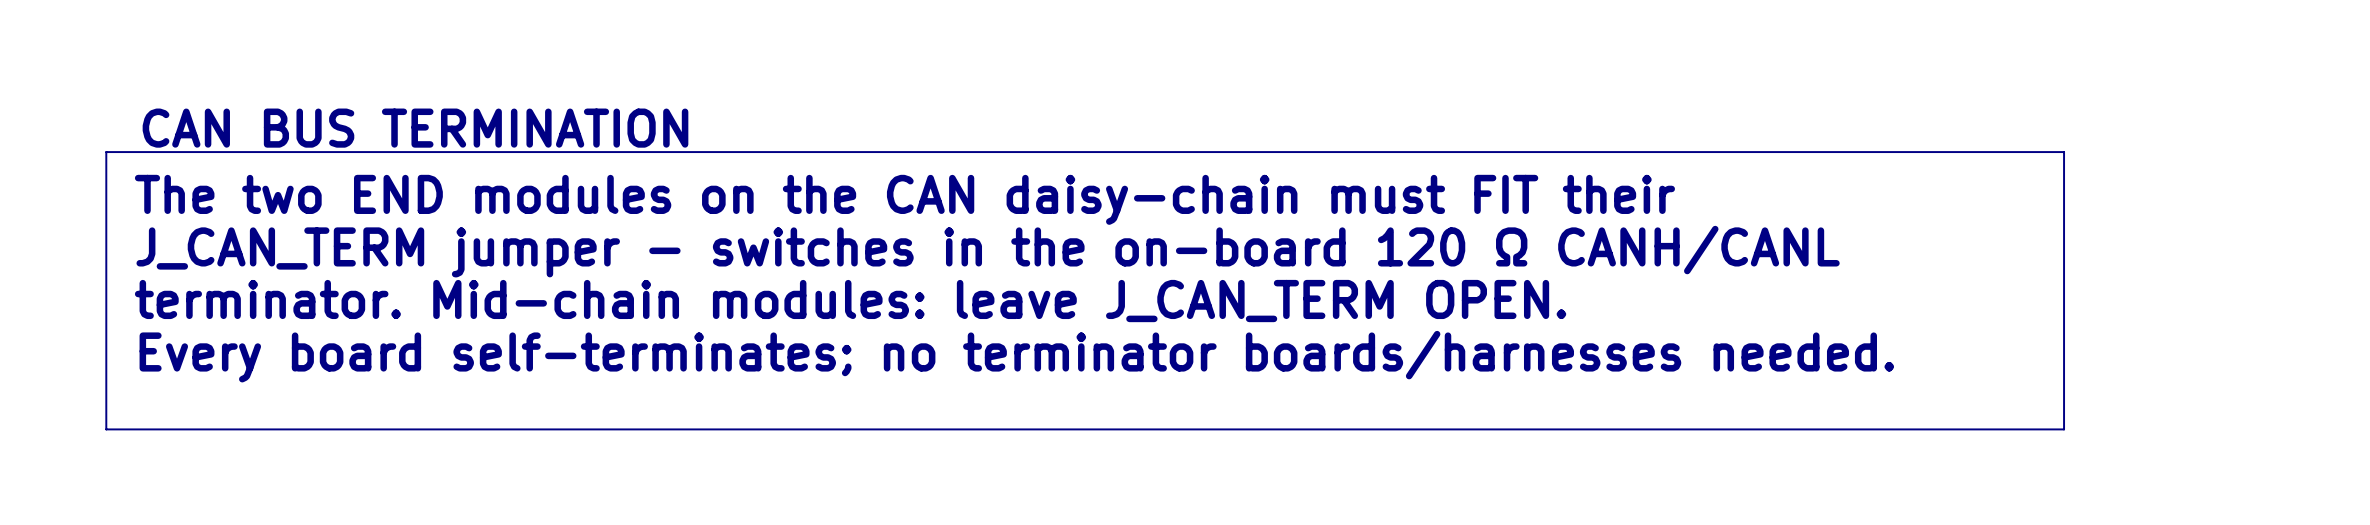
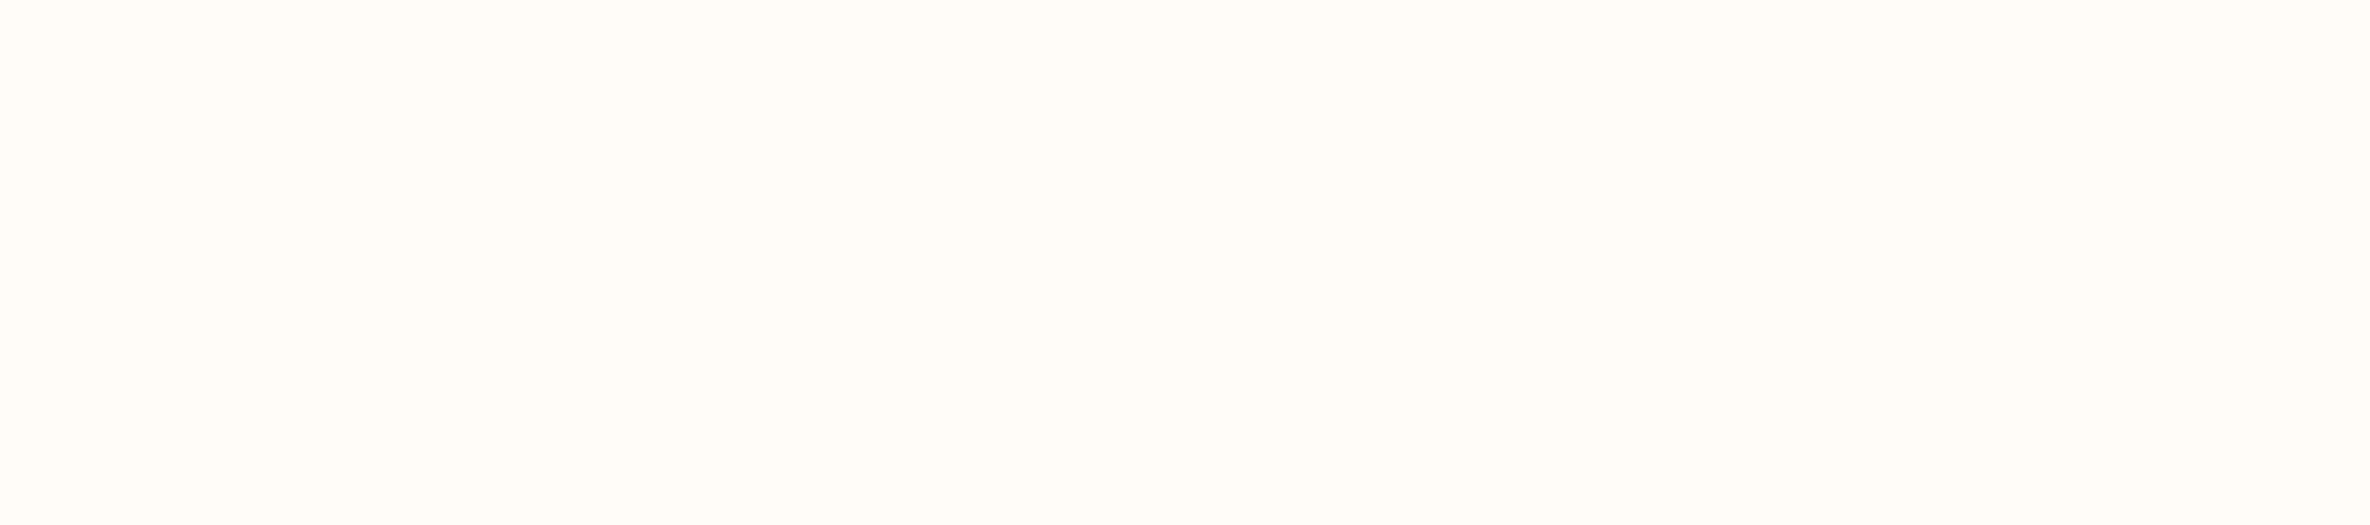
text: CAN BUS TERMINATION (415, 128) -> none
line: (106, 152) (2064, 152) (2064, 429) (106, 429) (106, 152) -> none
text: The two END modules on the CAN daisy-chain must FIT their (904, 199) -> none
text: J_CAN_TERM jumper - switches in the on-board 120 Ω CANH/CANL (988, 251) -> none
text: terminator. Mid-chain modules: leave J_CAN_TERM OPEN. (850, 301) -> none
text: Every board self-terminates; no terminator boards/harnesses needed. (1016, 356) -> none

